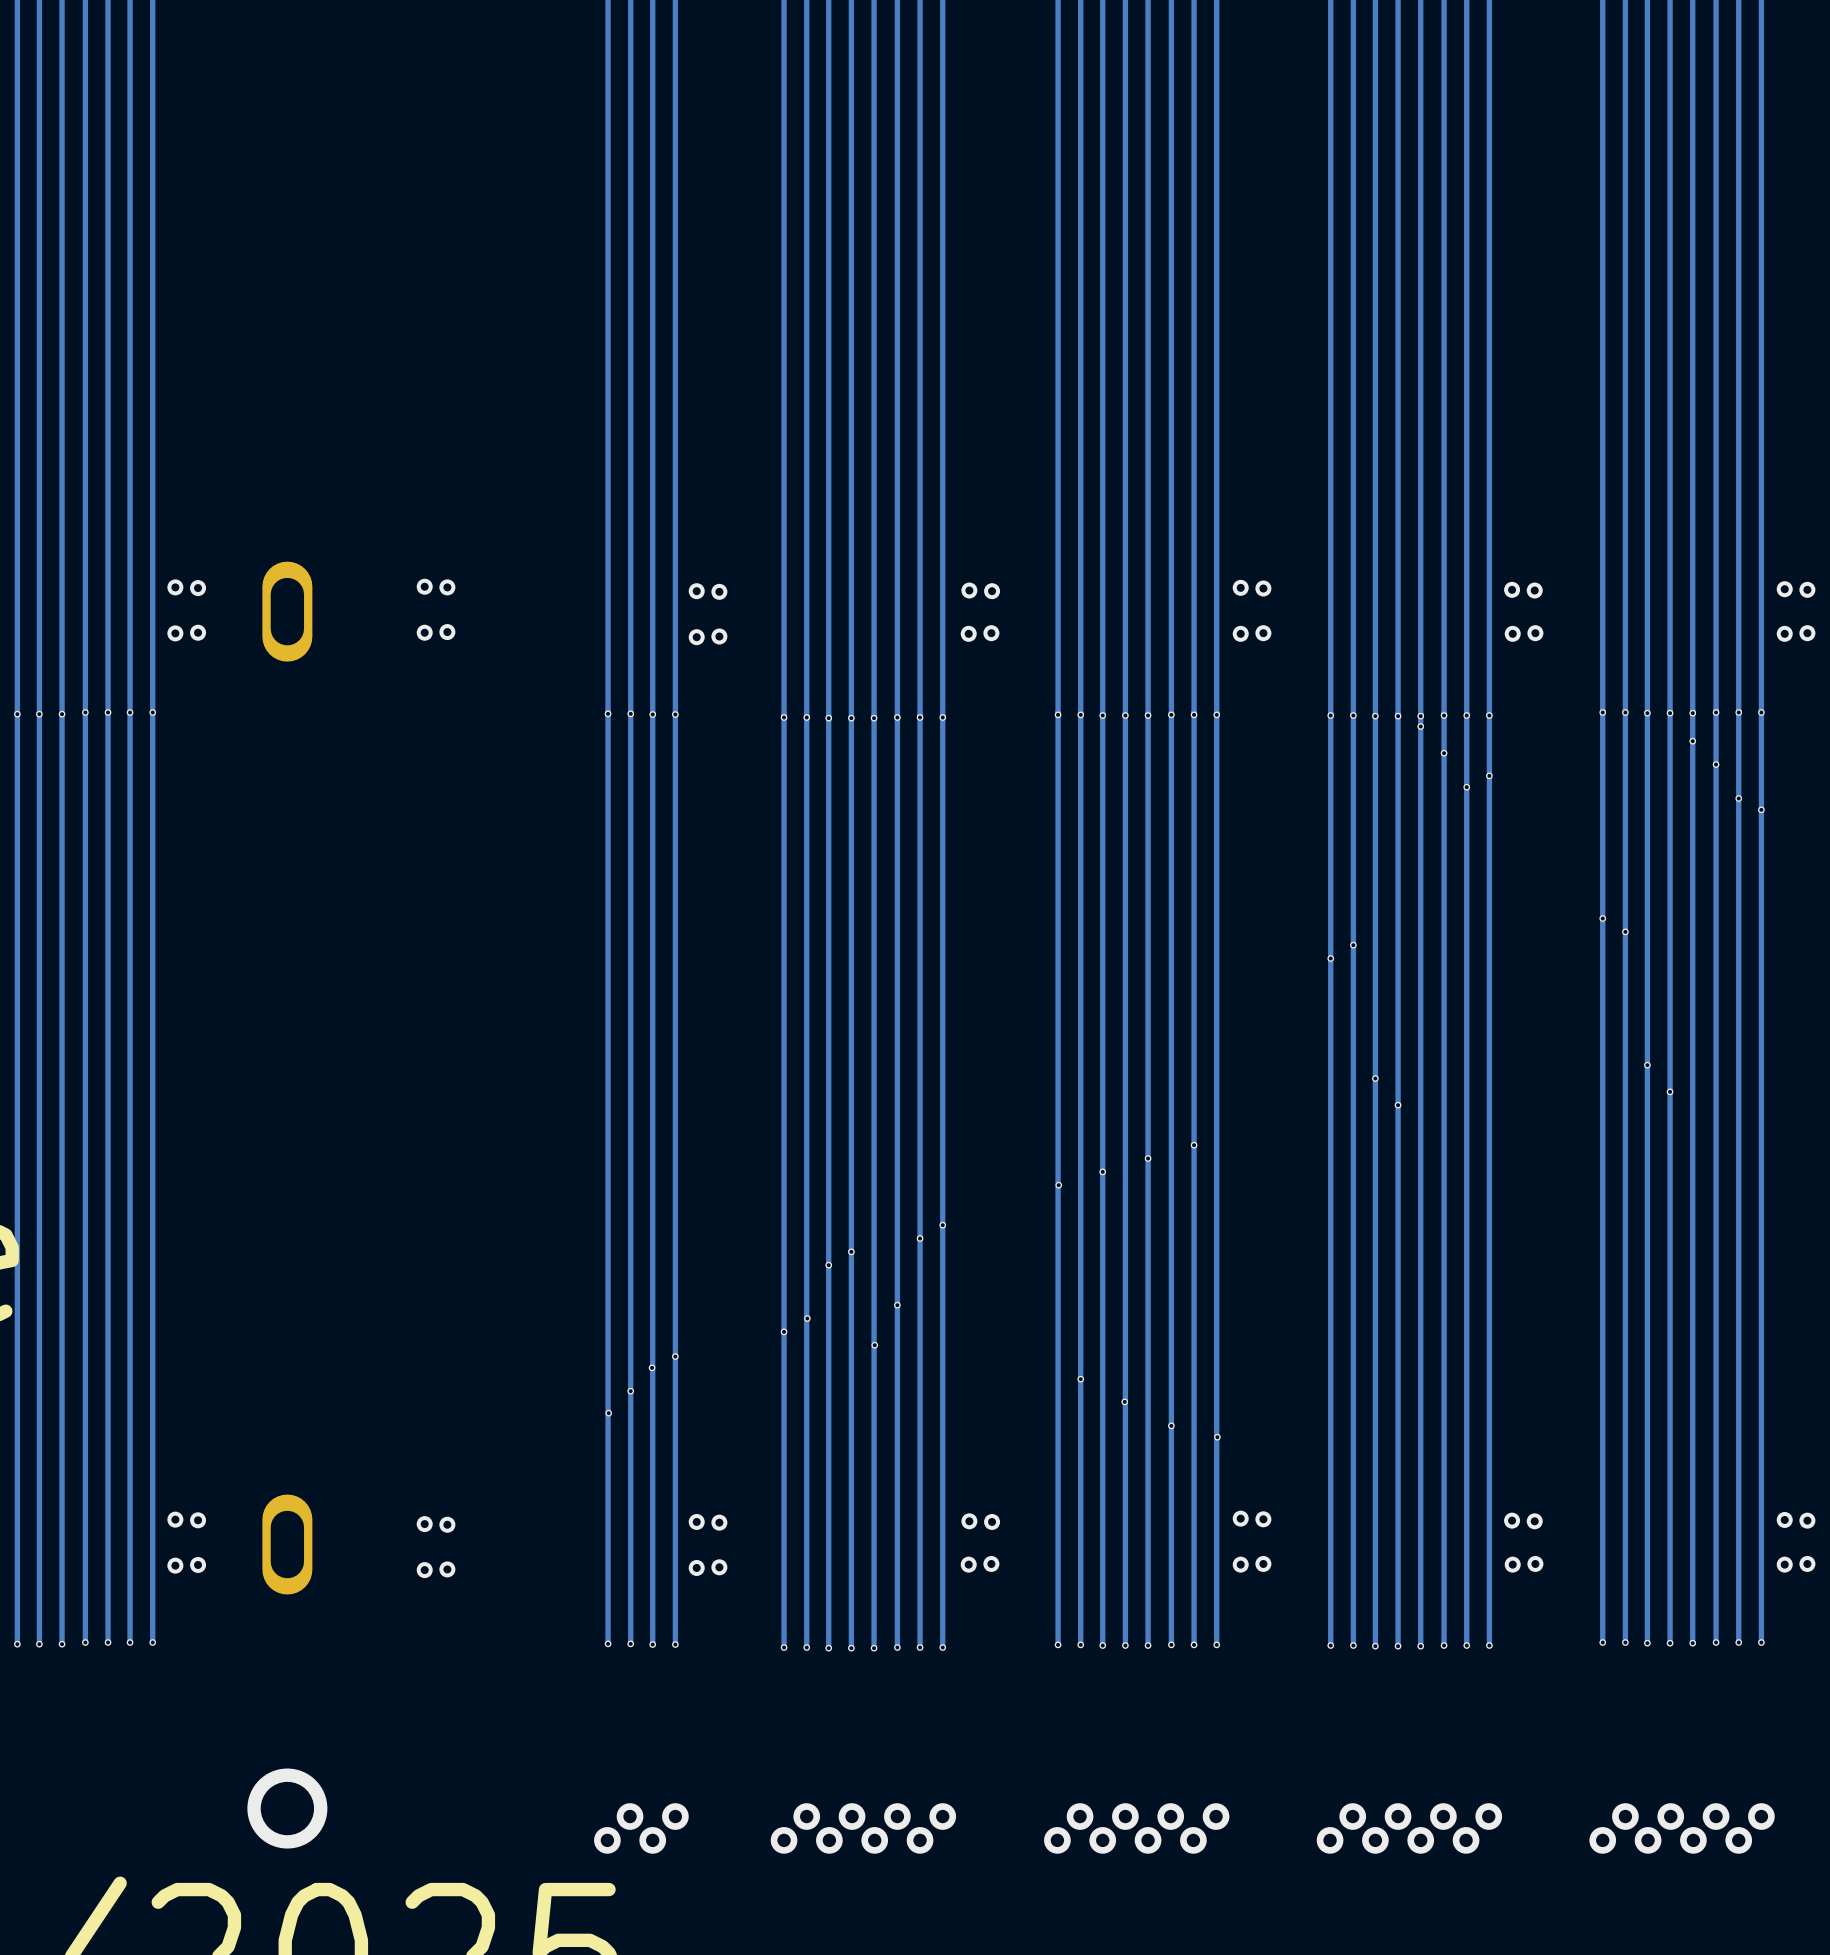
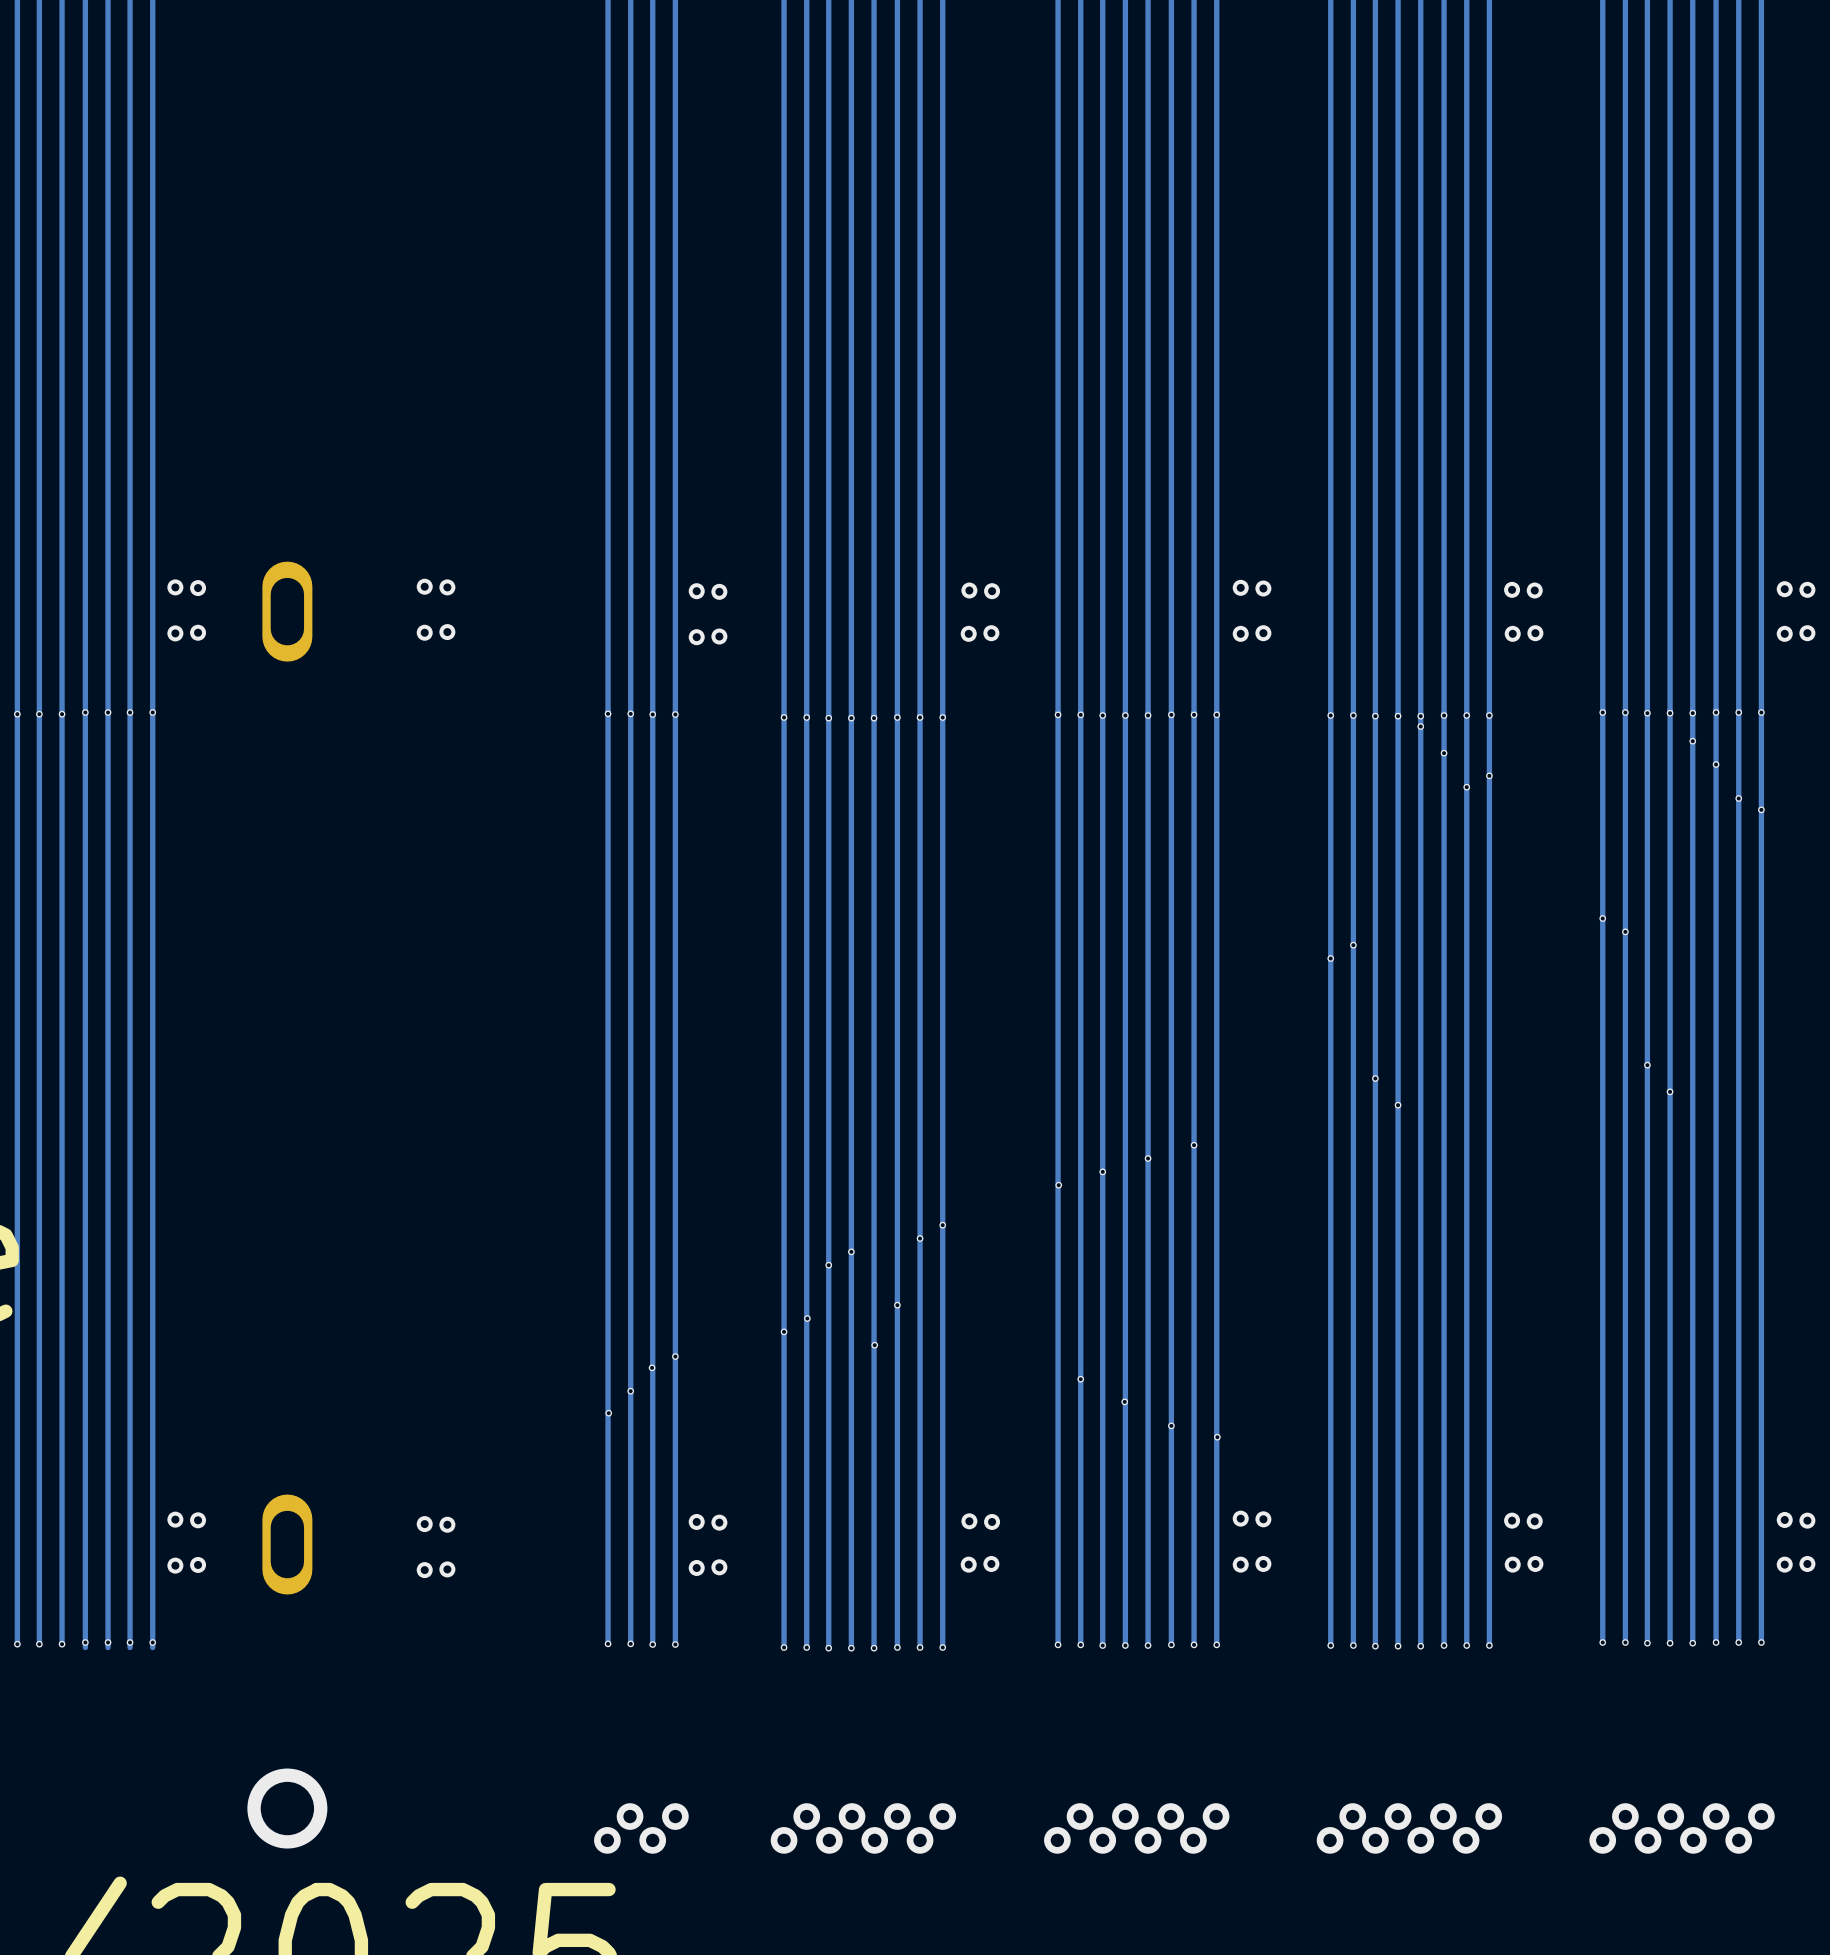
track: none -> (85, 1642) (85, 1647)
track: none -> (108, 1642) (108, 1647)
track: none -> (130, 1642) (130, 1647)
track: none -> (152, 1642) (152, 1647)

